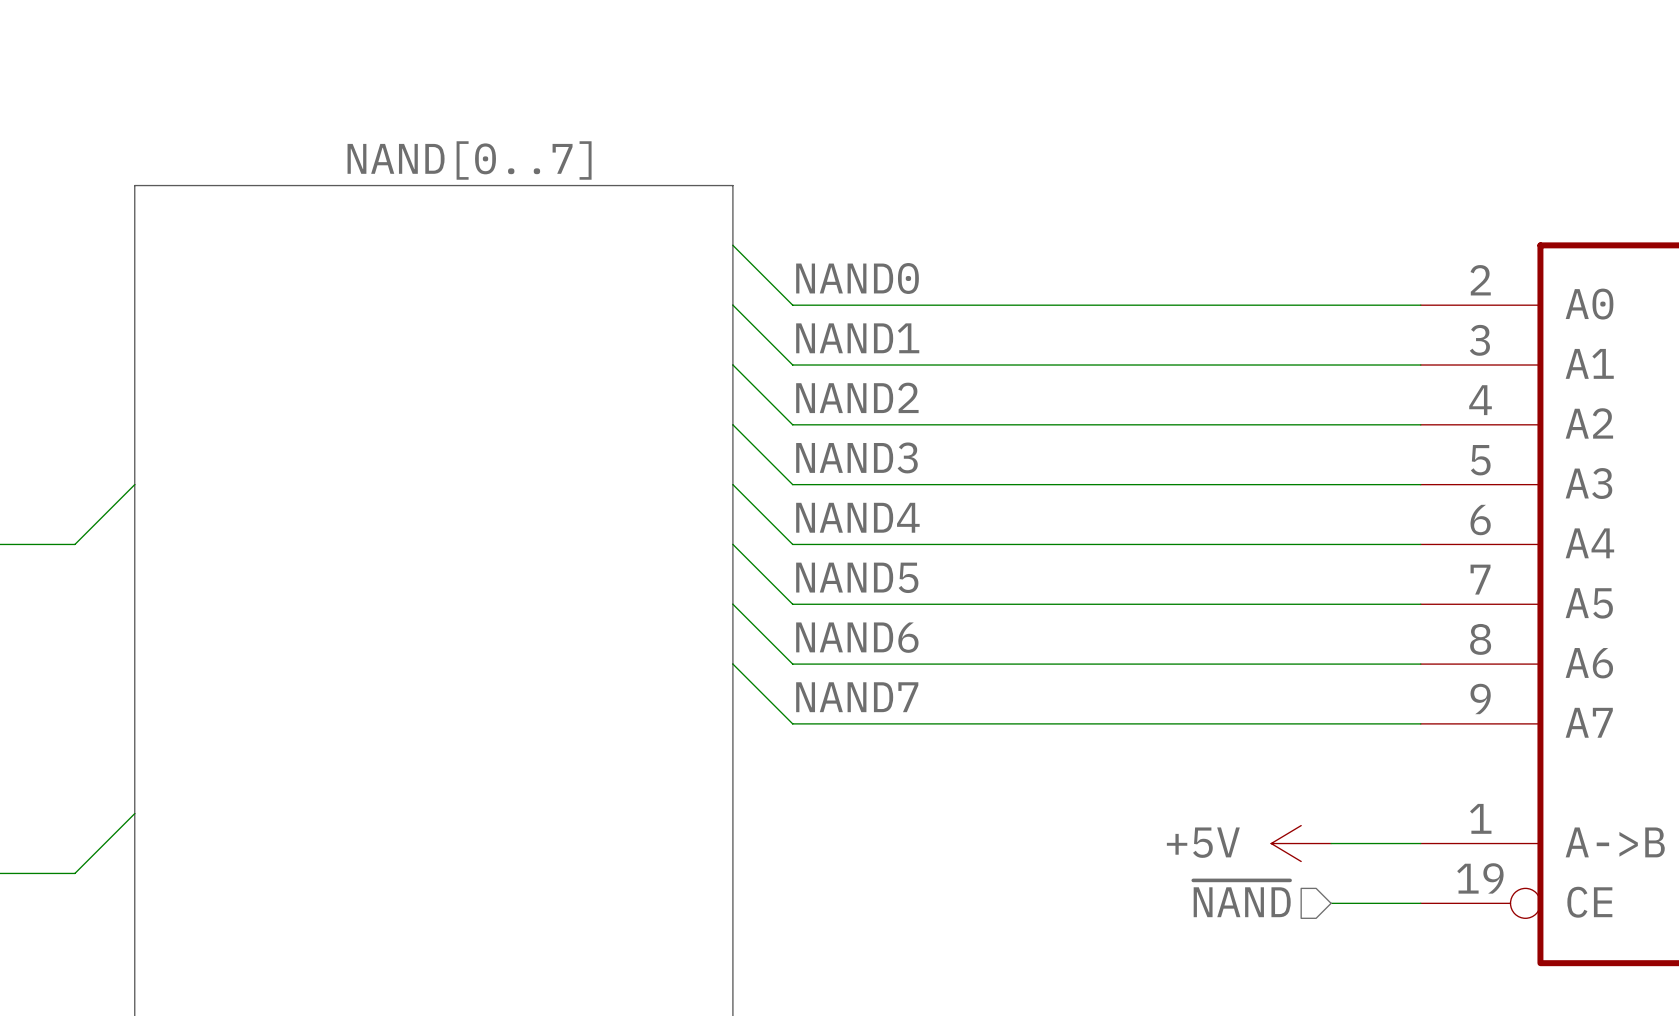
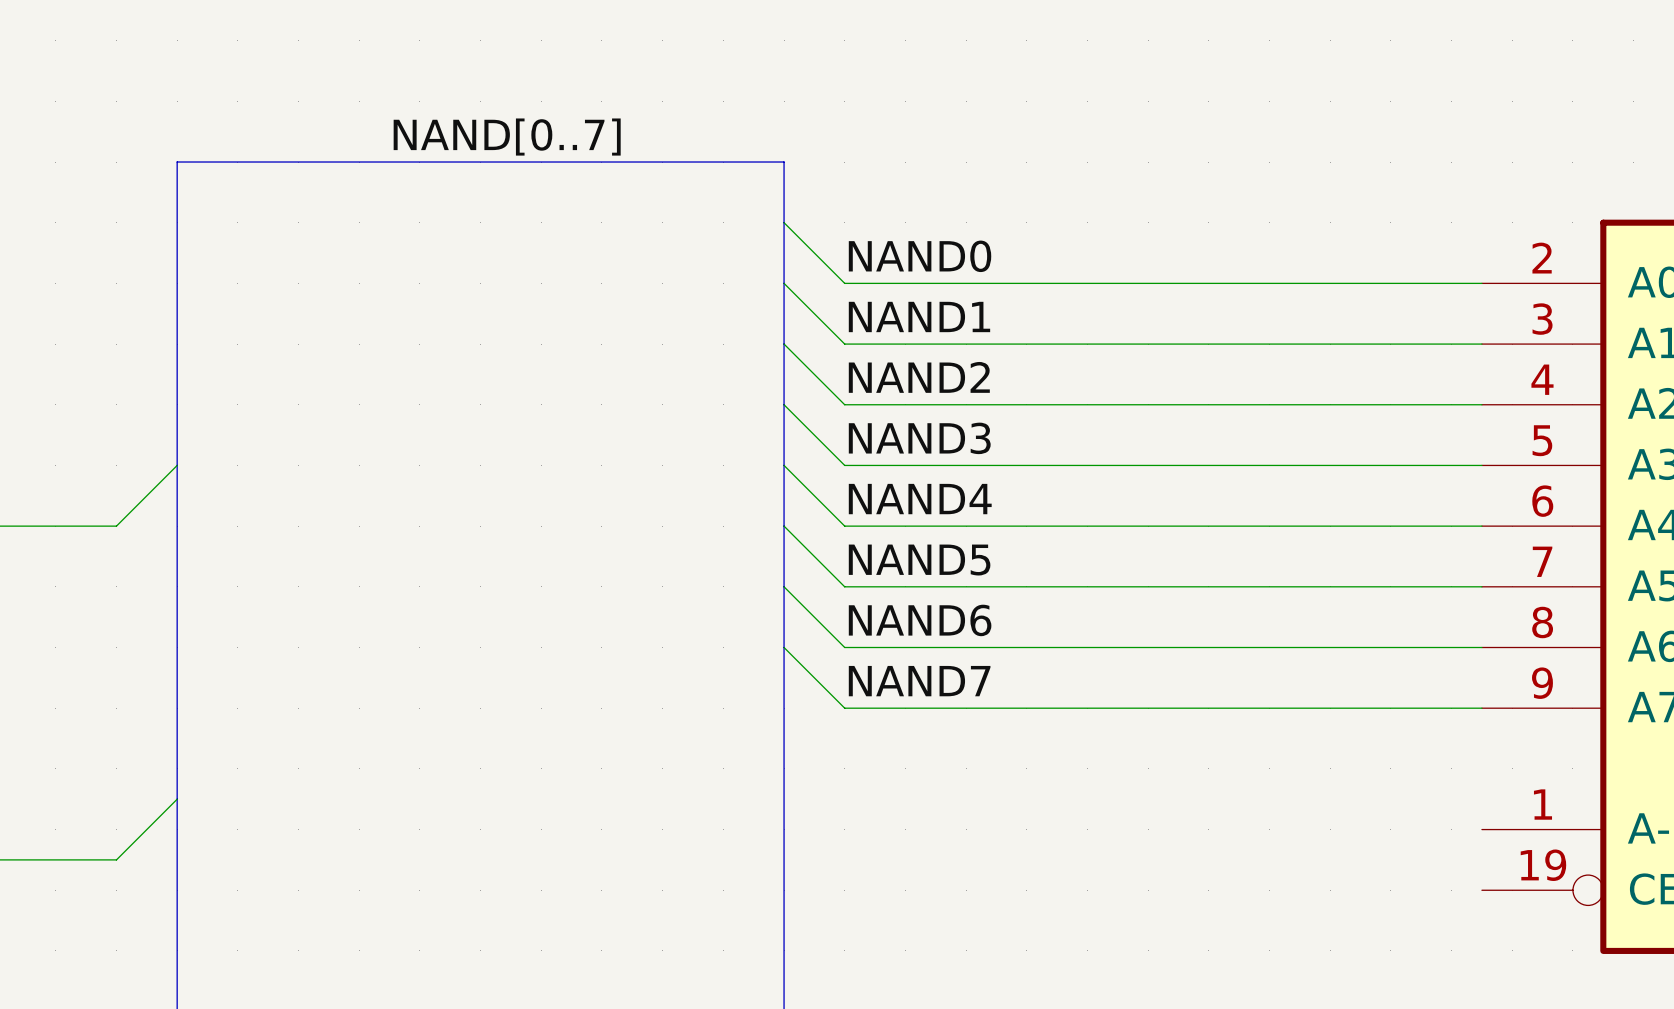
power symbol: +5V (1301, 843) -> none
wire: (1331, 843) (1420, 843) -> none
hierarchical label: ~{NAND} (1241, 898) -> none
wire: (1331, 903) (1420, 903) -> none

